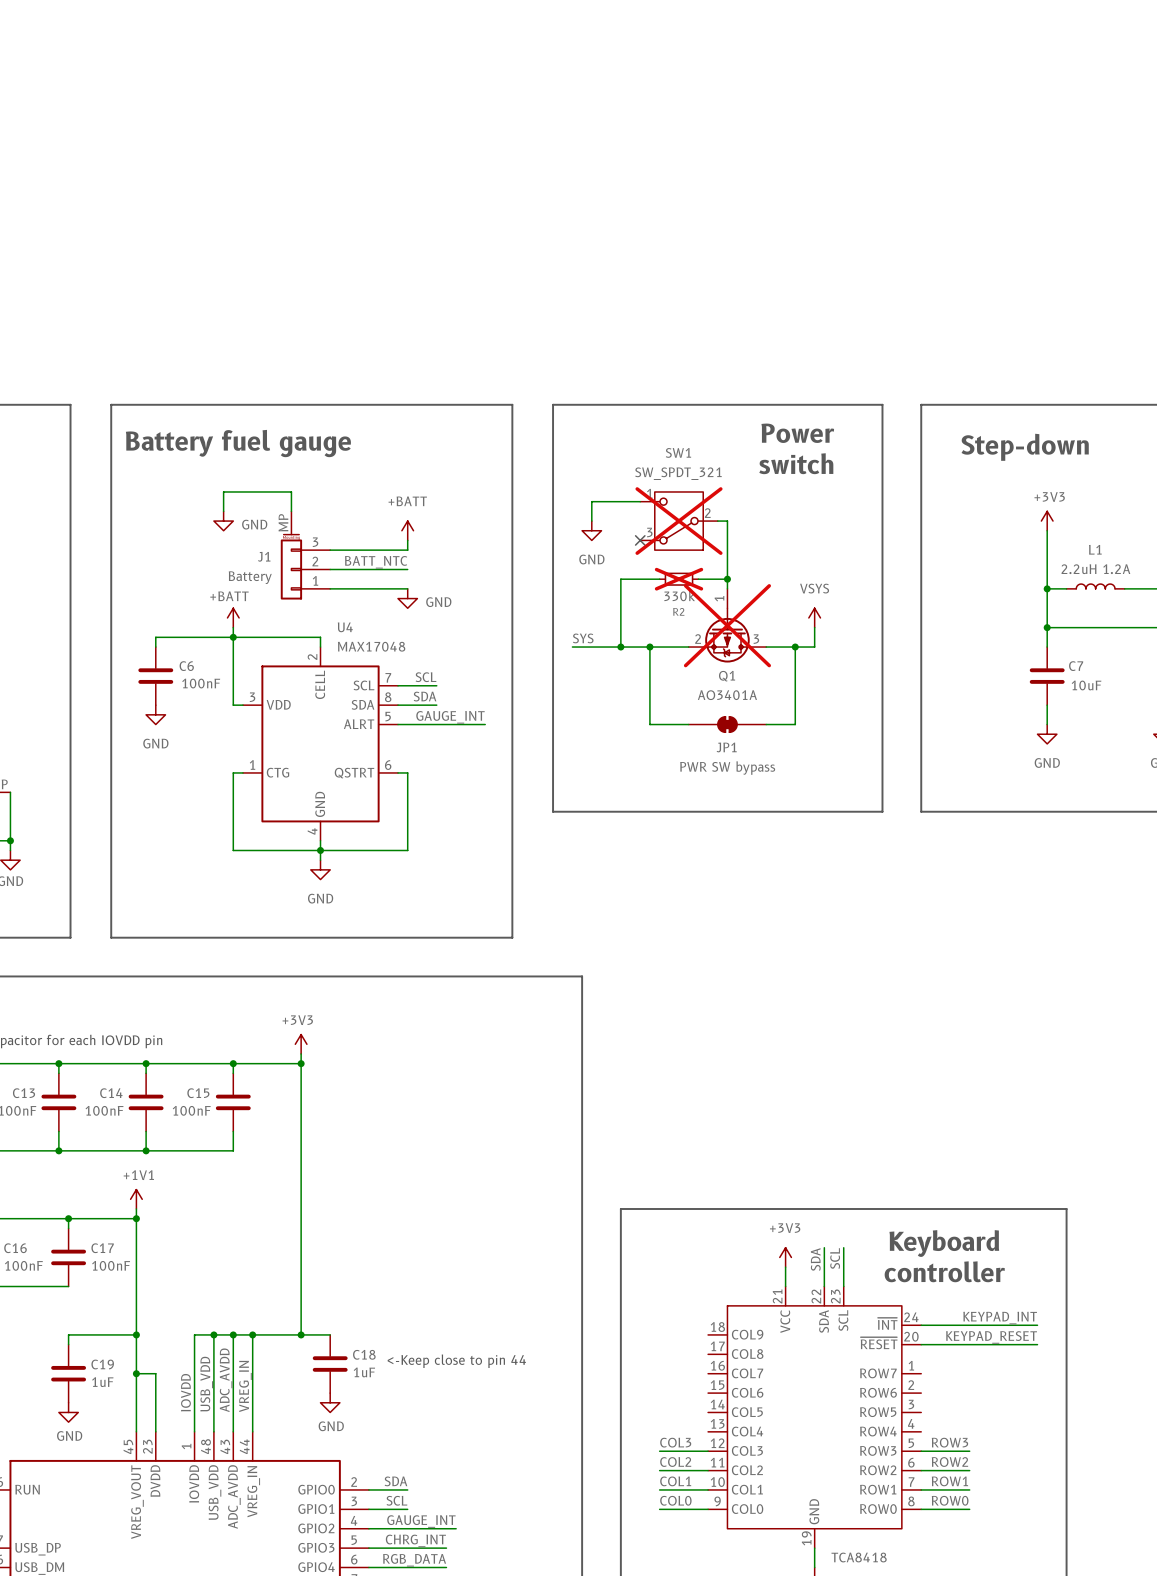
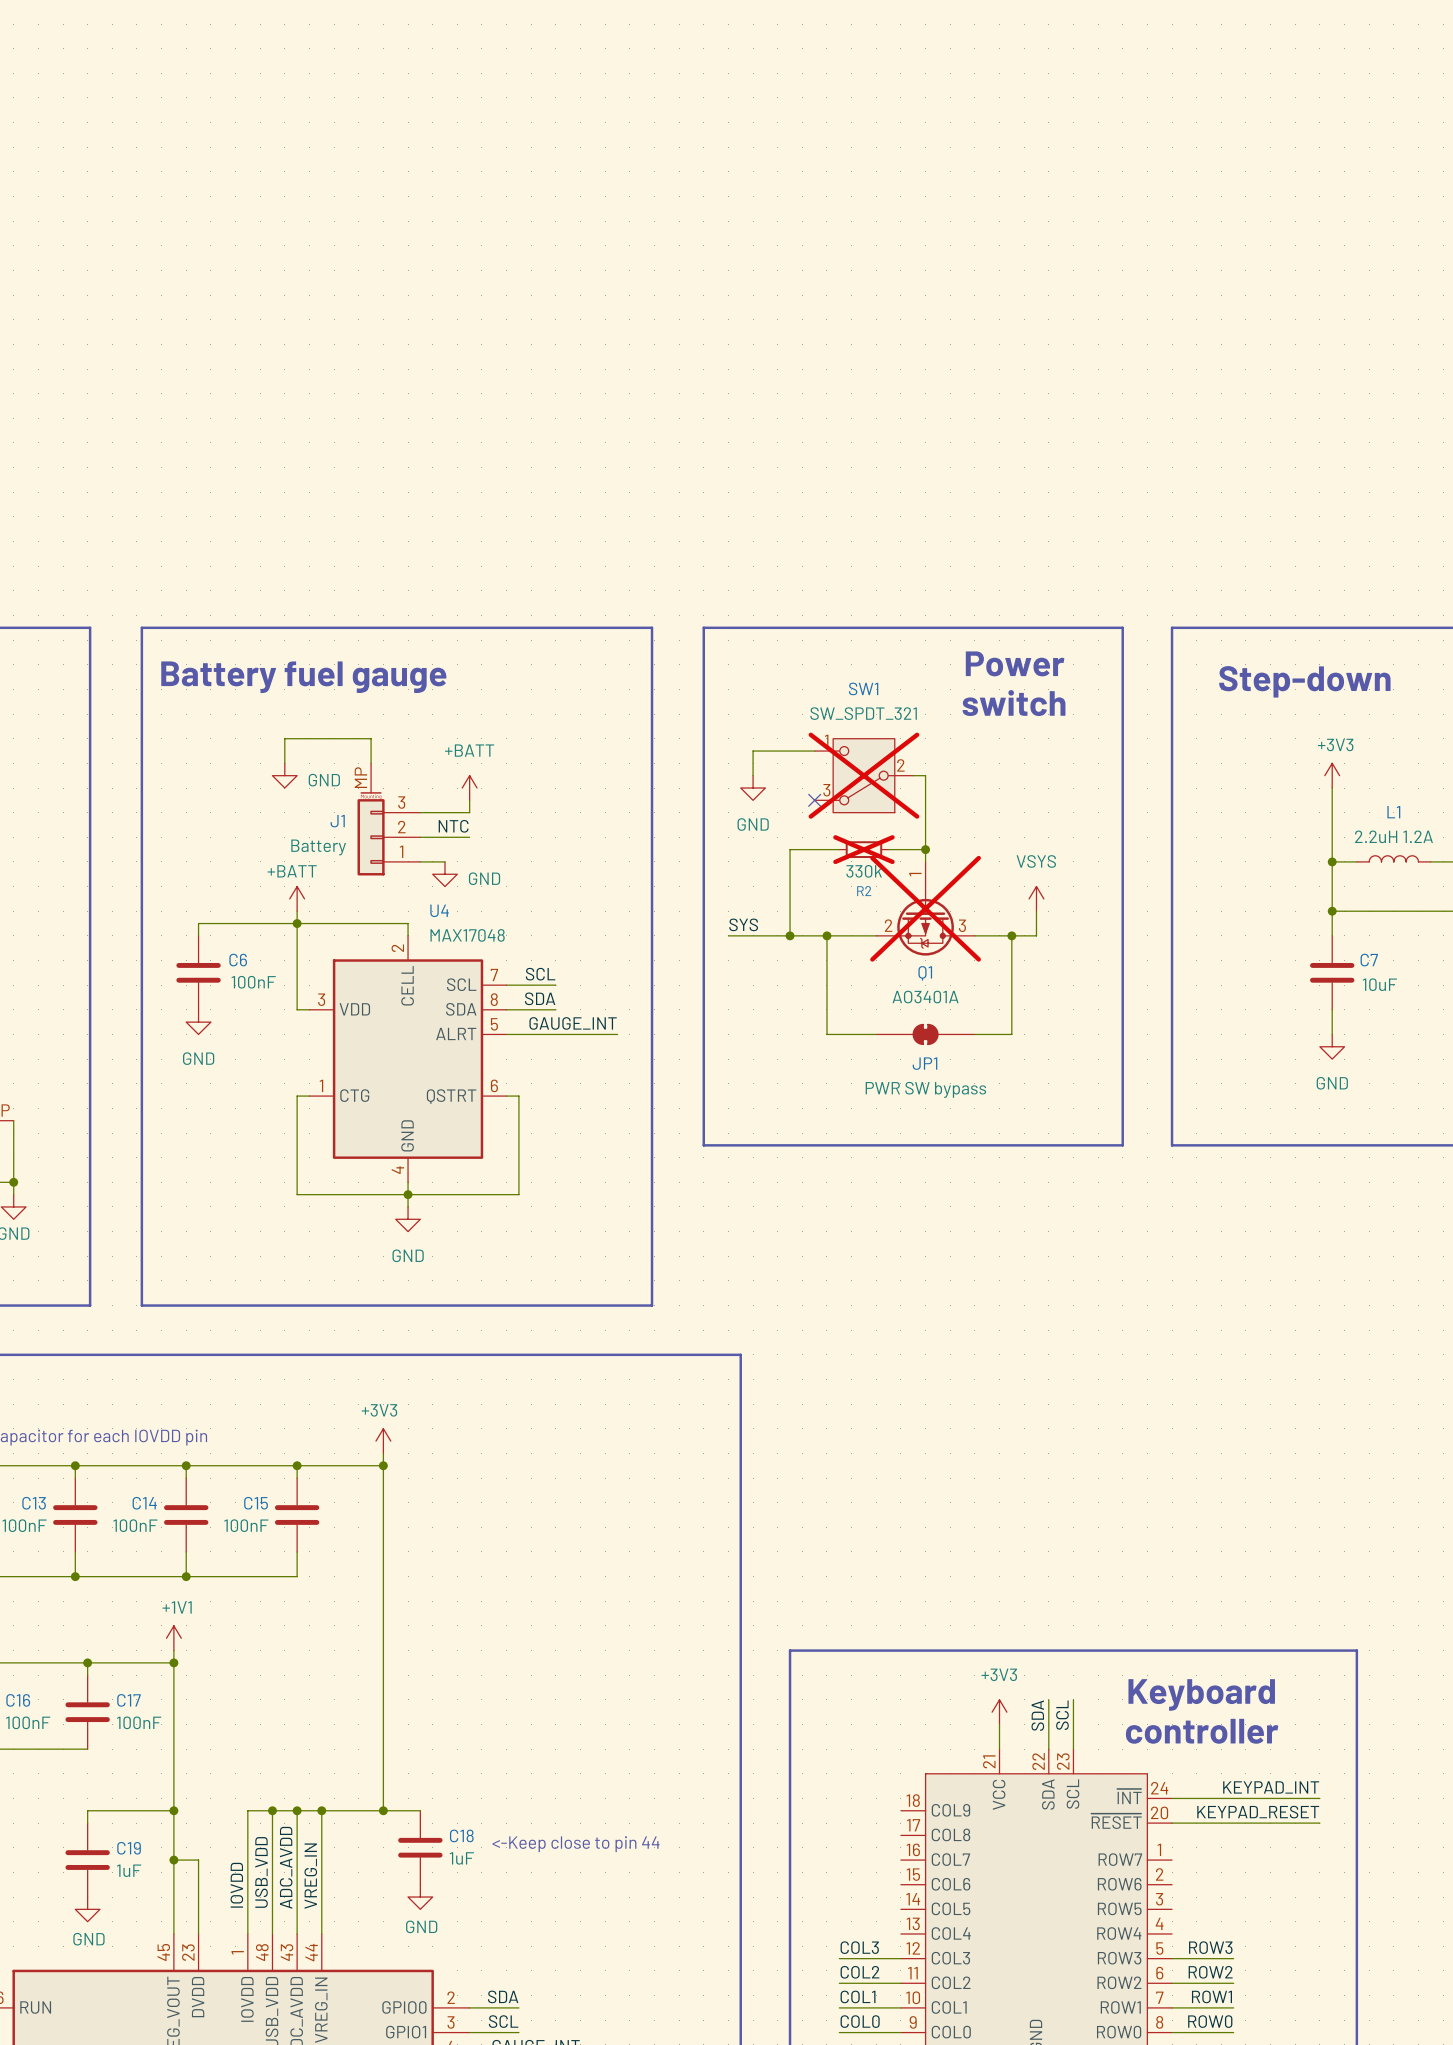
power symbol position: +BATT (407, 530) -> +BATT (469, 788)
wire: (407, 540) (407, 550) (368, 550) -> (469, 800) (469, 812)
label: none -> NTC (453, 826)
label: BATT_NTC (376, 562) -> none
wire: (368, 569) (407, 569) -> none
wire: (349, 588) (407, 588) -> none
power symbol position: GND (407, 598) -> GND (444, 874)

